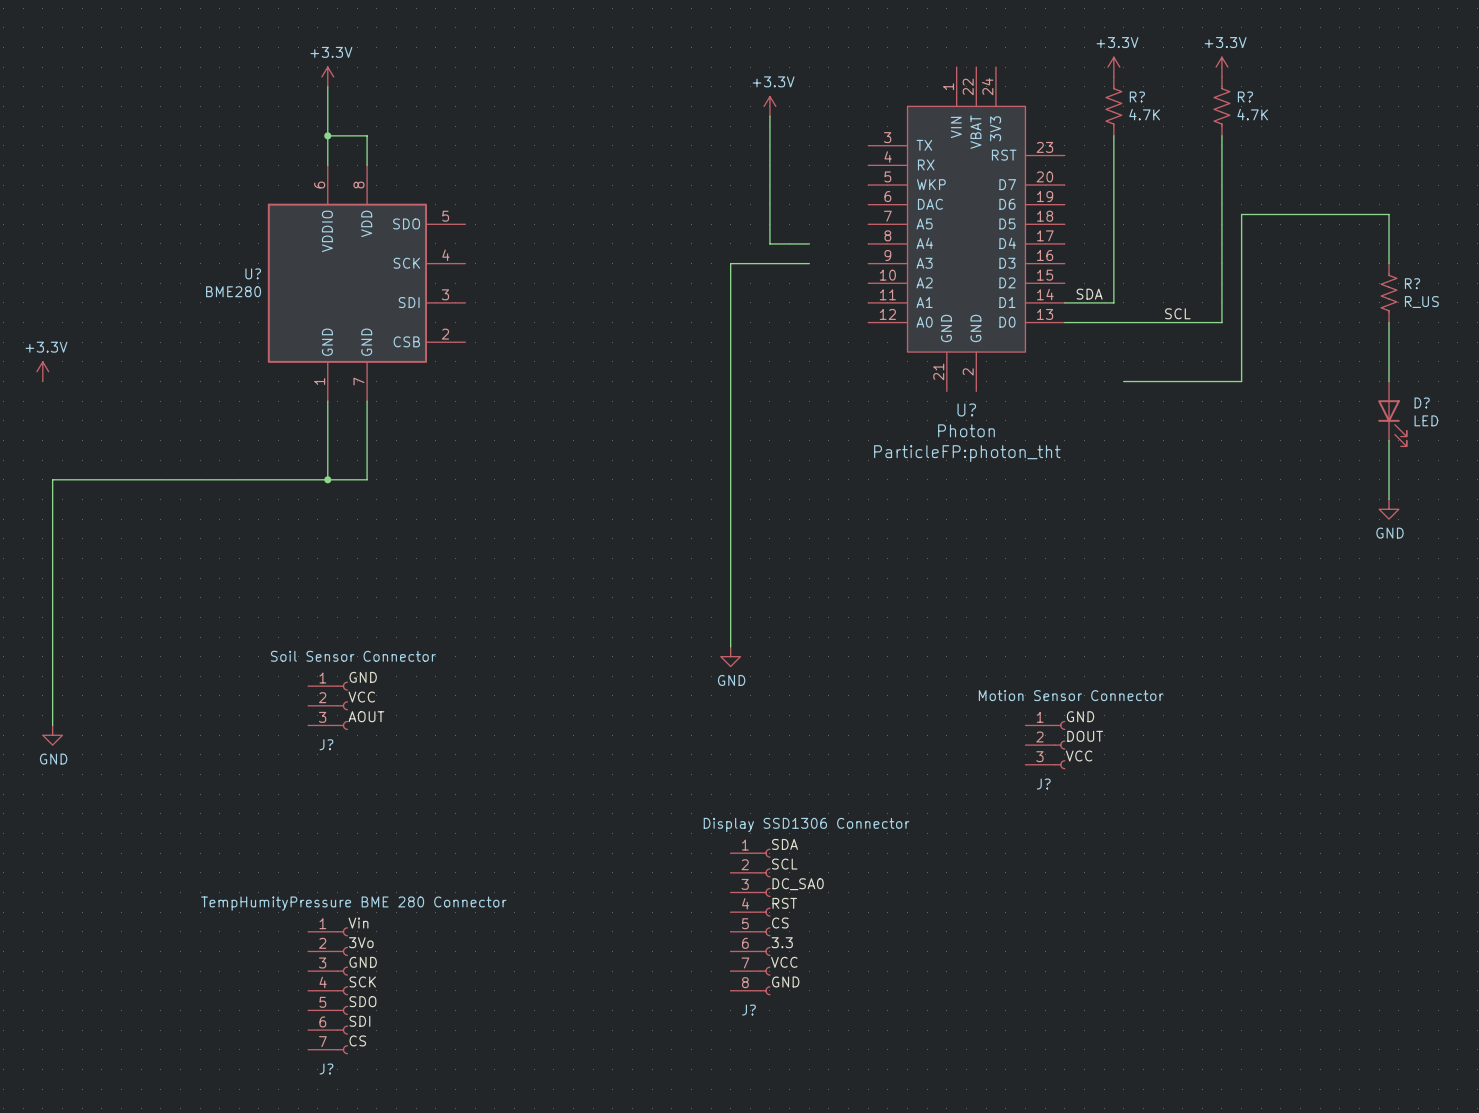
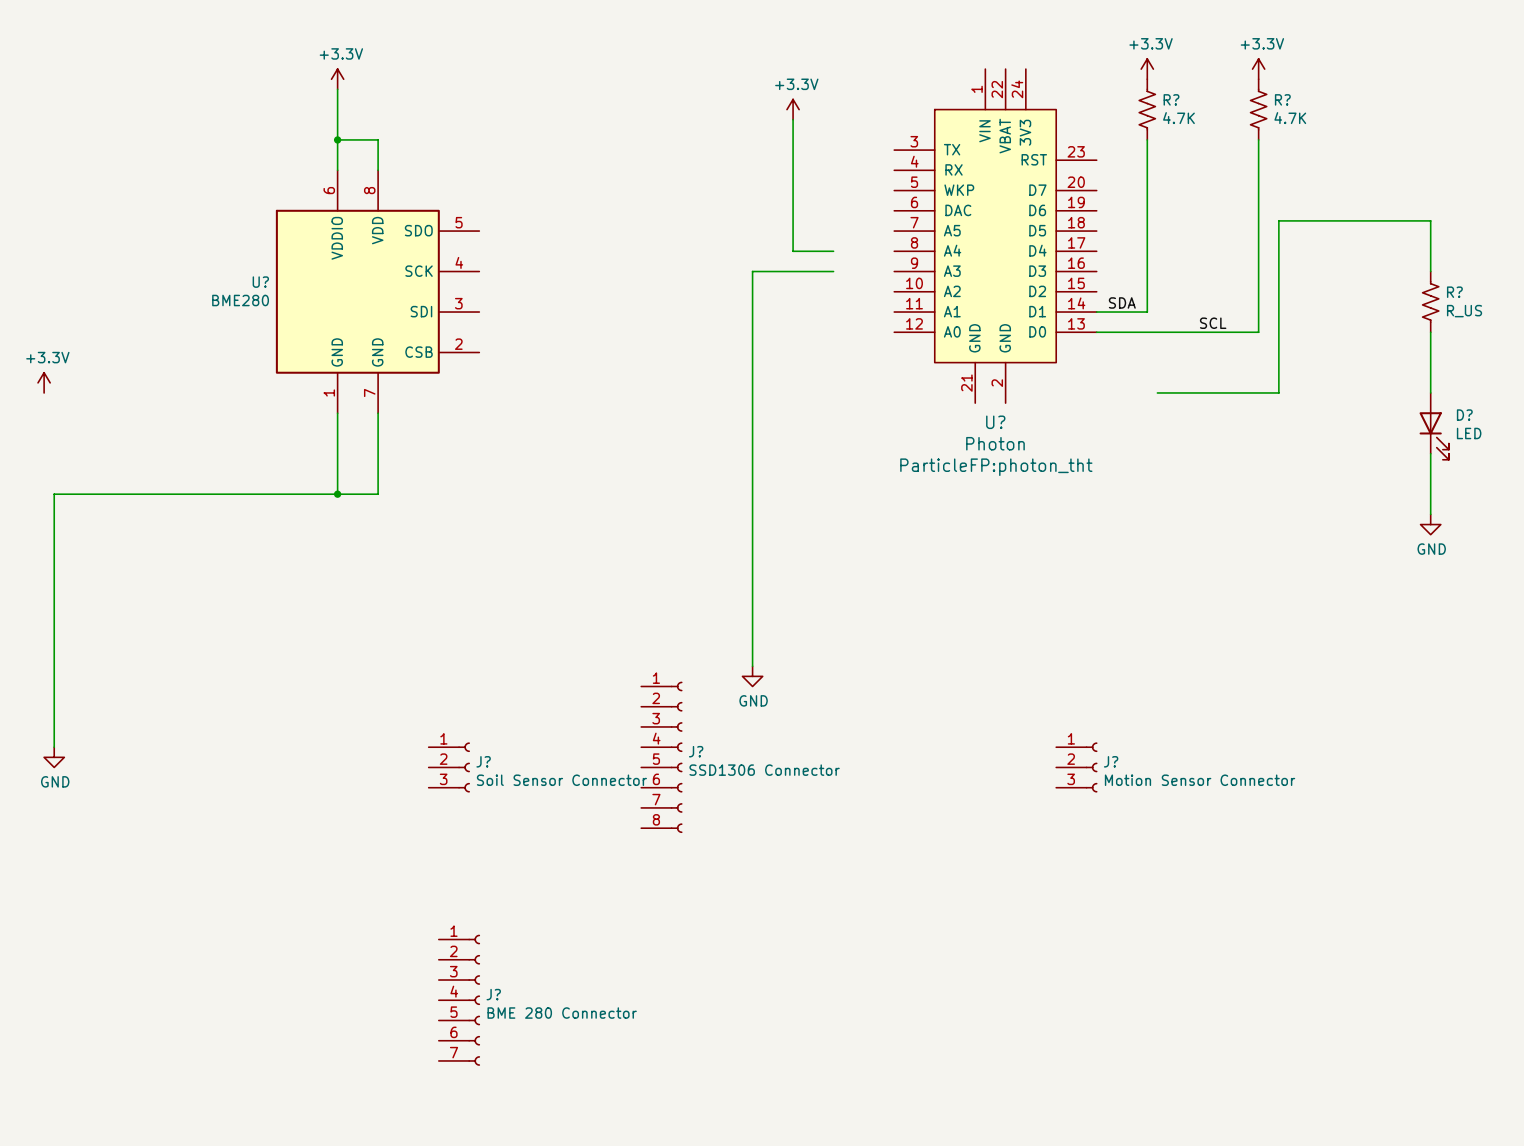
J? value position: Soil Sensor Connector (353, 656) -> Soil Sensor Connector (561, 780)
label: GND (363, 677) -> none
J? value position: Motion Sensor Connector (1071, 695) -> Motion Sensor Connector (1200, 780)
label: VCC (361, 697) -> none
J? position: (328, 705) -> (449, 767)
label: AOUT (366, 716) -> none
label: GND (1080, 716) -> none
J?: none -> SSD1306 Connector (661, 757)
label: DOUT (1085, 736) -> none
J? name position: J? (326, 744) -> J? (483, 761)
label: VCC (1079, 755) -> none
J? name position: J? (1043, 784) -> J? (1111, 761)
label: SDA (785, 844) -> none
label: SCL (784, 864) -> none
label: DC_SA0 (798, 884) -> none
label: RST (784, 903) -> none
J?: Display SSD1306 Connector (750, 921) -> none
label: Vin (358, 923) -> none
label: CS (780, 923) -> none
label: 3Vo (361, 942) -> none
label: 3.3 (782, 942) -> none
label: GND (363, 962) -> none
label: VCC (784, 962) -> none
J?: none -> BME 280 Connector (459, 1000)
label: SCK (362, 981) -> none
label: GND (785, 981) -> none
J?: TempHumityPressure BME 280 Connector (328, 990) -> none
label: SDO (362, 1001) -> none
label: SDI (359, 1021) -> none
label: CS (357, 1040) -> none

